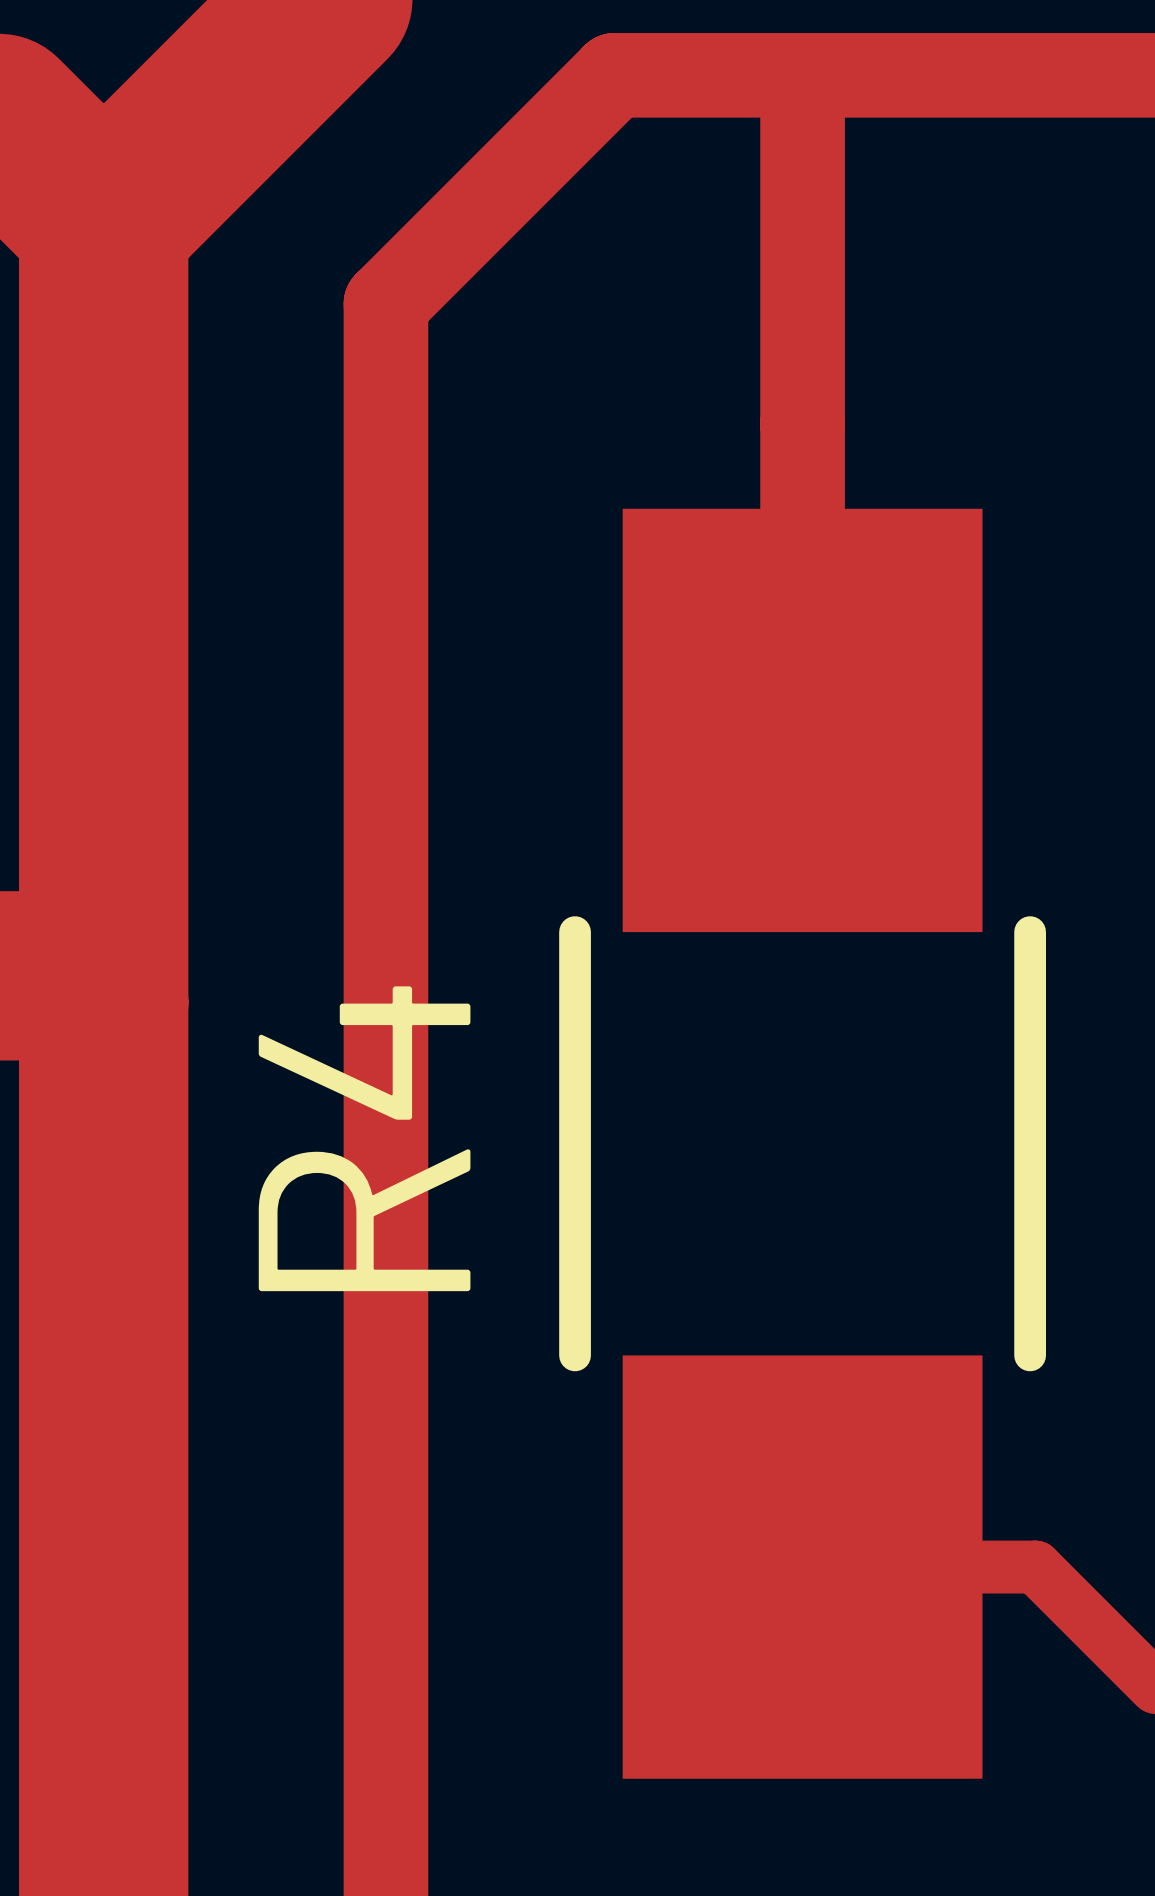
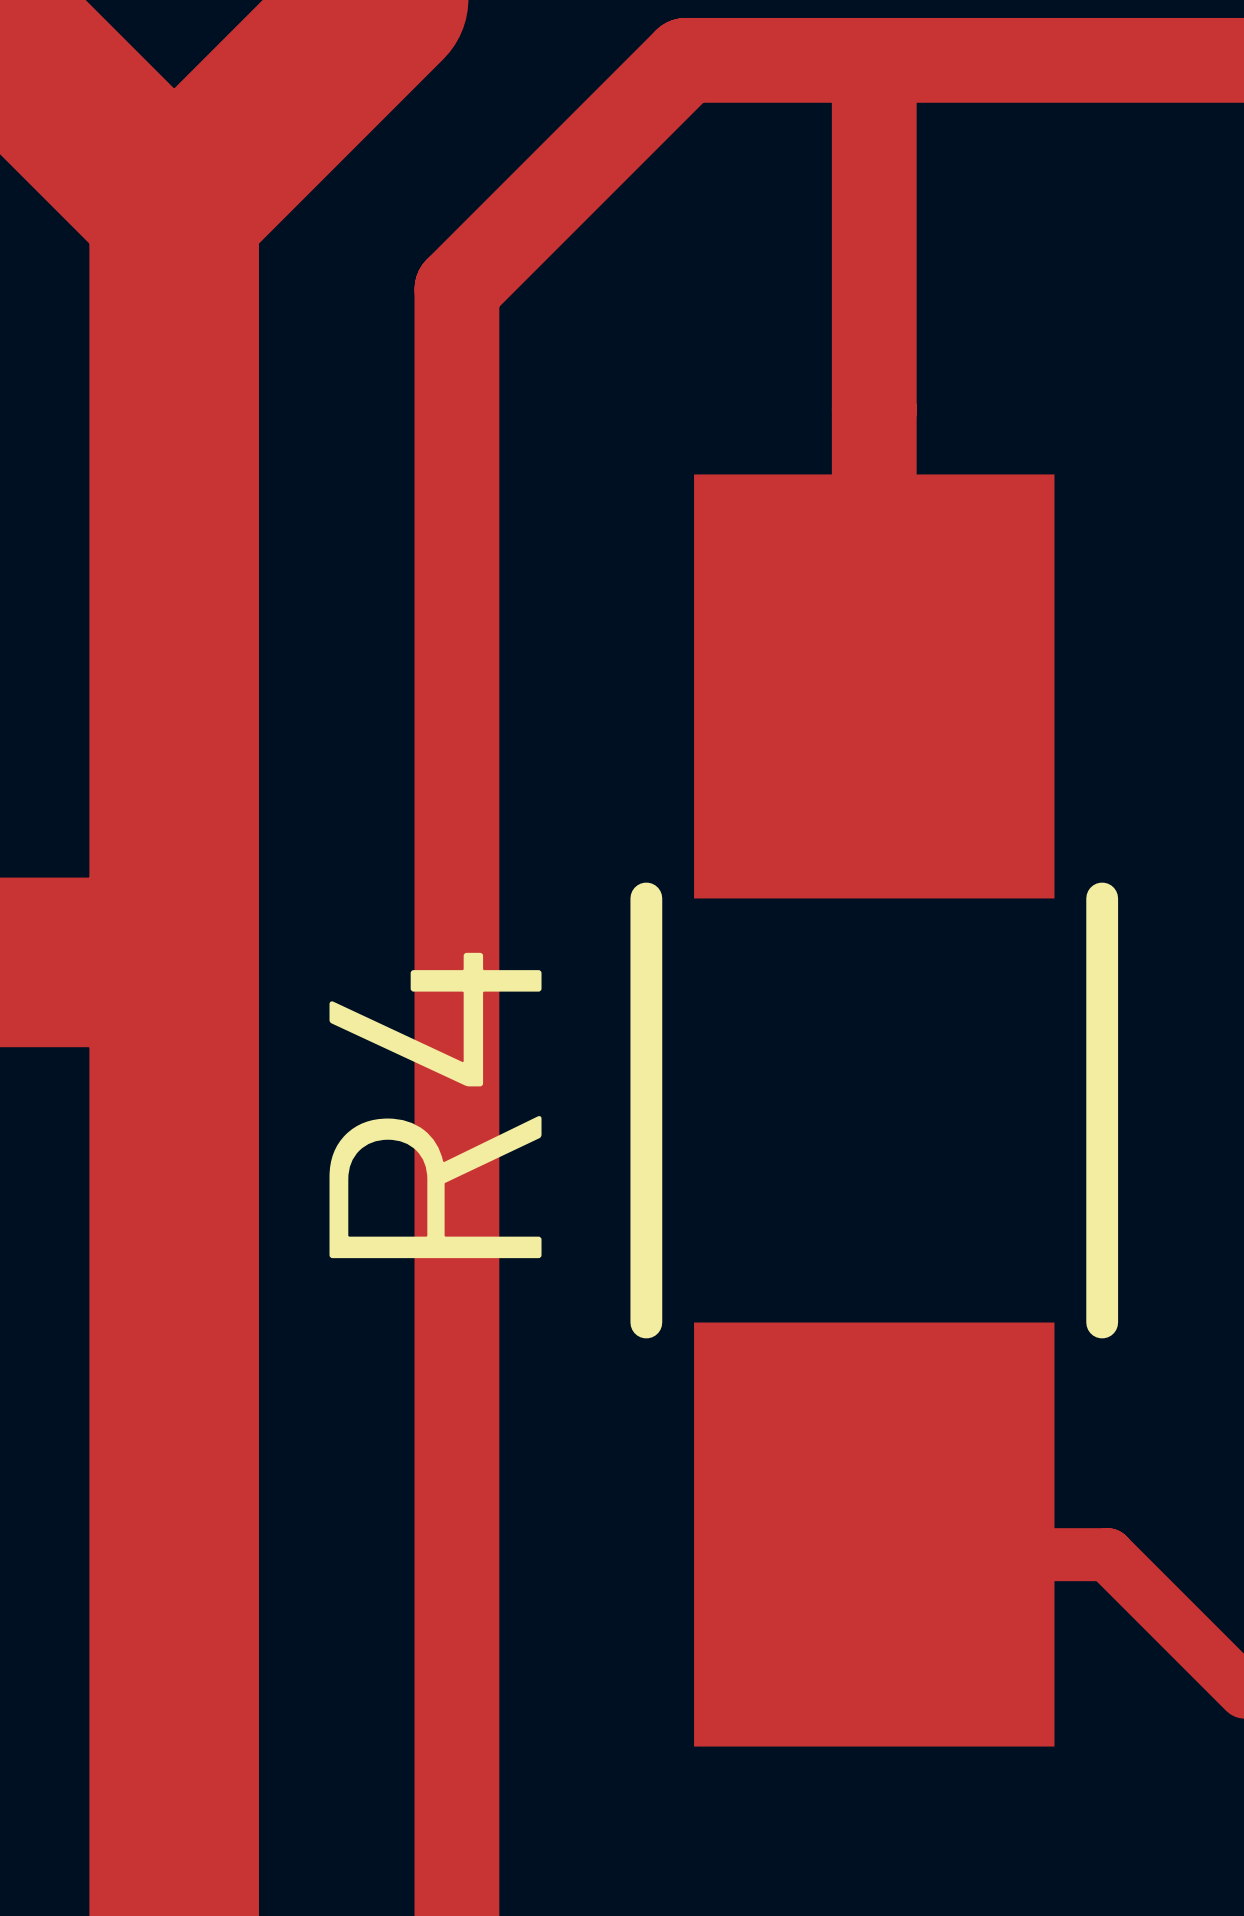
R4 position: (802, 1143) -> (874, 1110)

